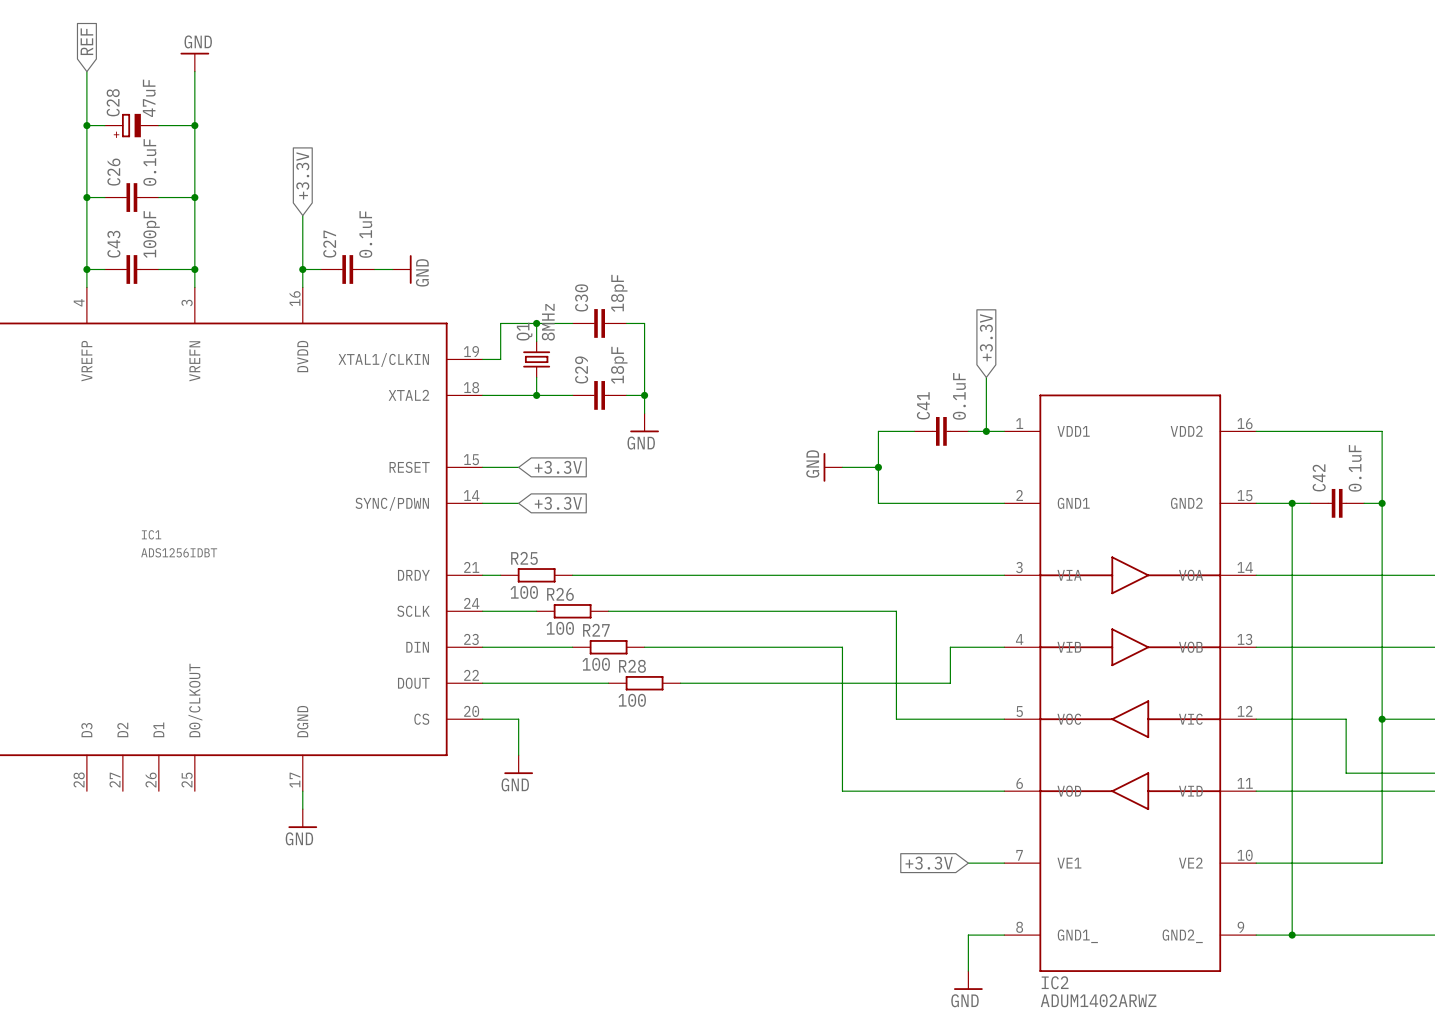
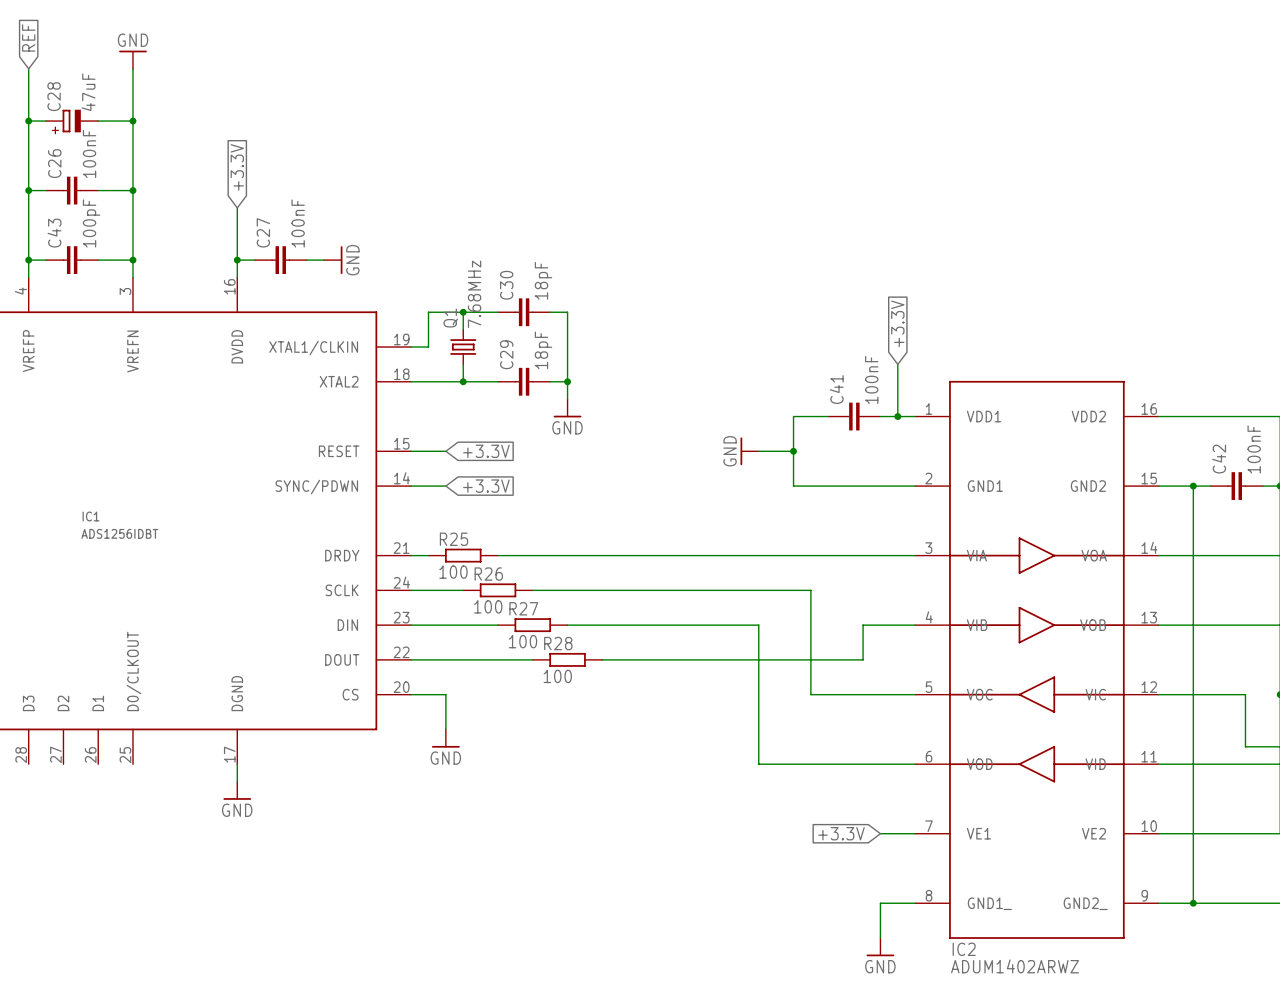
C26 value: 0.1uF (149, 162) -> 100nF (89, 153)
C27 value: 0.1uF (365, 234) -> 100nF (298, 223)
Q1 value: 8MHz (548, 322) -> 7.68MHz (474, 294)
C41 value: 0.1uF (959, 396) -> 100nF (871, 379)
C42 value: 0.1uF (1355, 468) -> 100nF (1254, 449)

